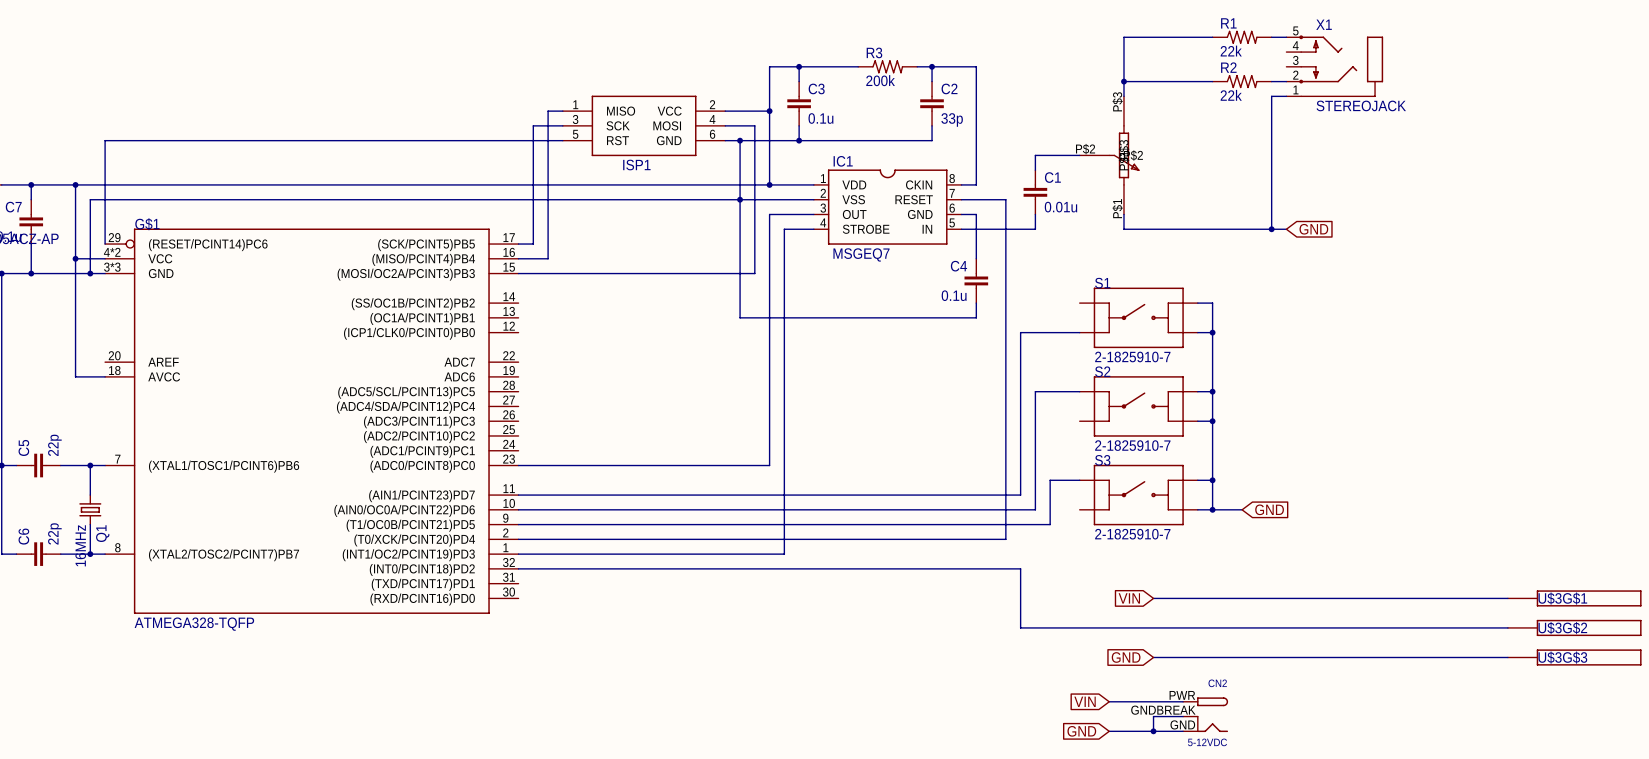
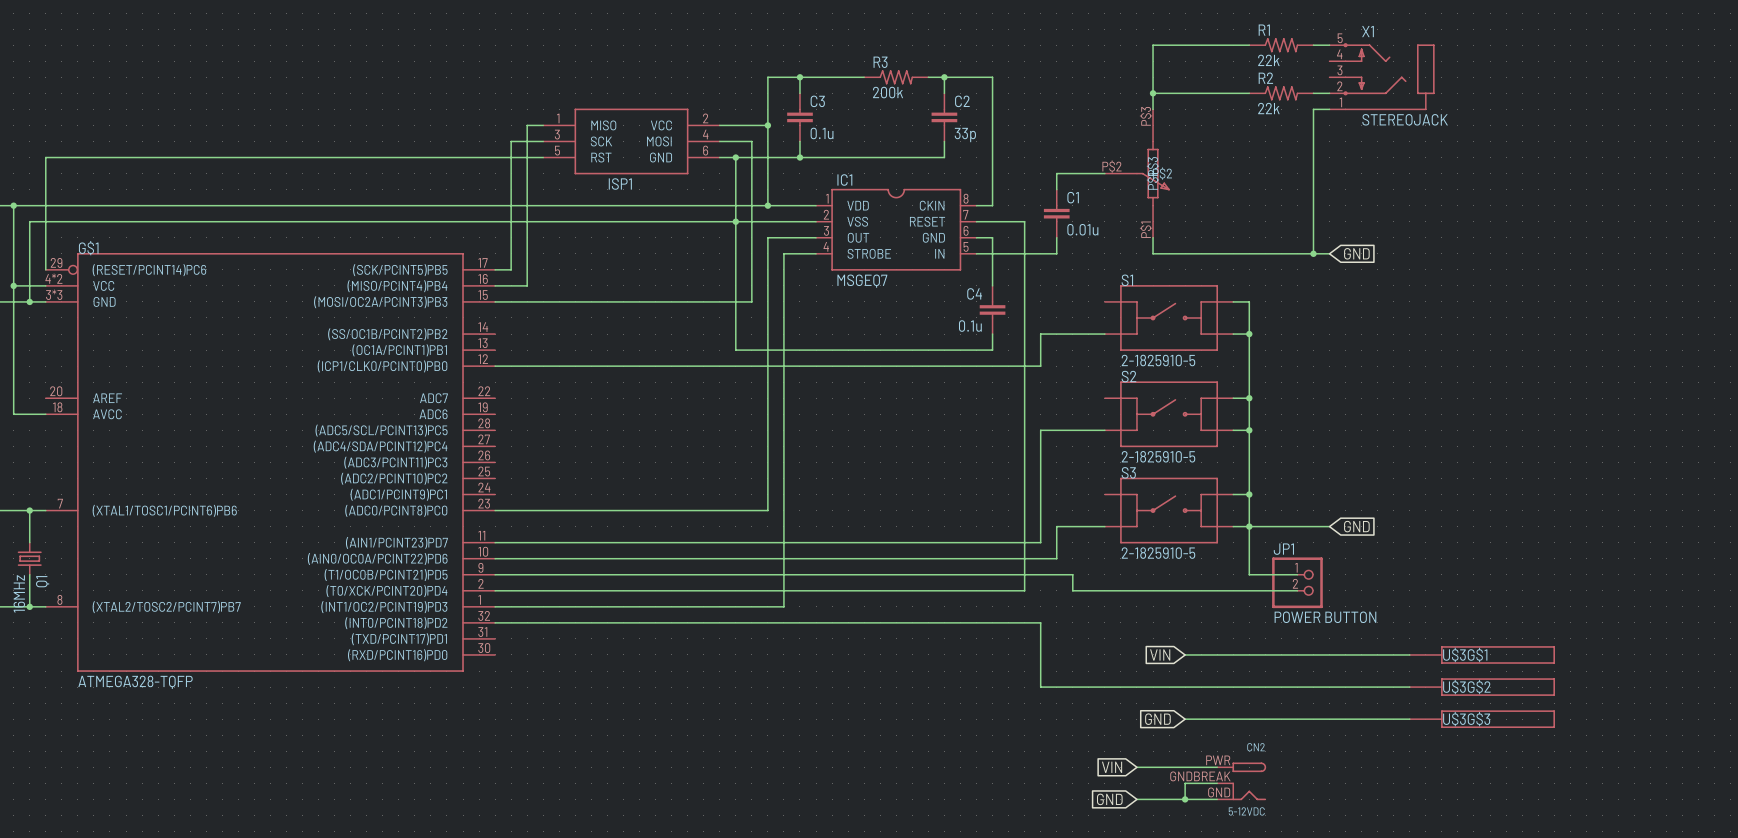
wire: none -> (1233, 301) (1249, 301) (1249, 334)
wire: none -> (1104, 334) (1040, 334) (1040, 366) (495, 366)
junction: none -> (1249, 334)
S1 position: (1138, 317) -> (1169, 317)
wire: (1079, 332) (1020, 332) (1020, 391) -> (1056, 430) (1040, 430)
wire: (1197, 332) (1212, 332) -> (1233, 398) (1249, 398)
junction: (1212, 332) -> none
S1 value: 2-1825910-7 (1132, 356) -> 2-1825910-5 (1158, 360)
junction: none -> (1249, 398)
wire: (1035, 391) (1035, 480) -> none
S2 position: (1138, 406) -> (1169, 414)
wire: (1197, 421) (1212, 421) -> (1233, 494) (1249, 494)
junction: (1212, 421) -> none
S2 value: 2-1825910-7 (1132, 445) -> 2-1825910-5 (1158, 456)
junction: none -> (1249, 494)
wire: (1050, 480) (1050, 524) -> (1072, 526) (1056, 526)
wire: none -> (1249, 526) (1329, 526)
S3 position: (1138, 495) -> (1169, 510)
wire: (1197, 509) (1242, 509) -> none
wire: none -> (1249, 558) (1249, 574) (1297, 574)
junction: (1212, 509) -> none
global label position: GND (1269, 509) -> GND (1356, 526)
wire: none -> (1072, 574) (1072, 590) (1297, 590)
JP1: none -> POWER BUTTON (1297, 582)
S3 value: 2-1825910-7 (1132, 534) -> 2-1825910-5 (1158, 553)
wire: (1360, 598) (1507, 598) -> none
U$3G$1 position: (1574, 598) -> (1482, 654)
wire: (1360, 627) (1507, 627) -> none
U$3G$2 position: (1574, 627) -> (1482, 687)
wire: (1360, 657) (1507, 657) -> none
U$3G$3 position: (1574, 657) -> (1482, 719)

